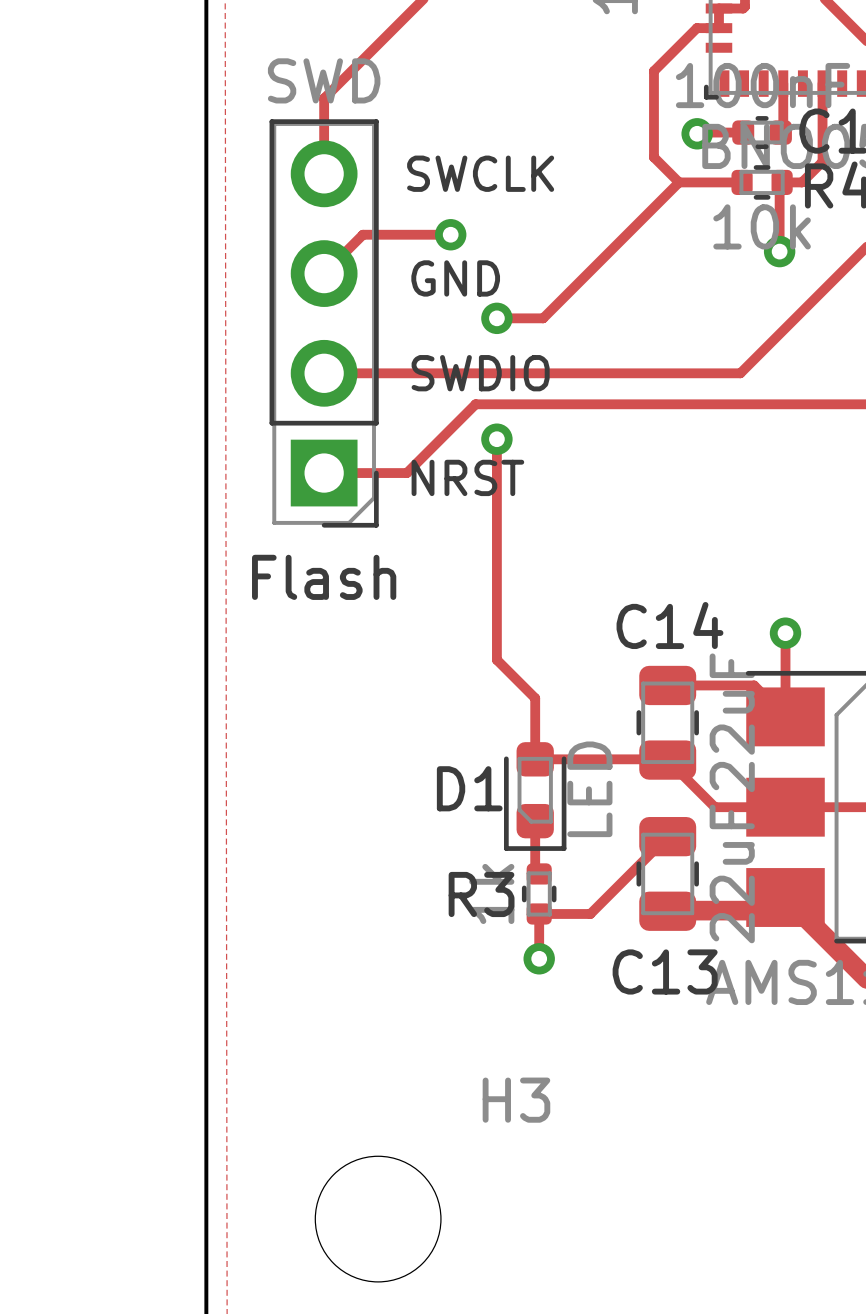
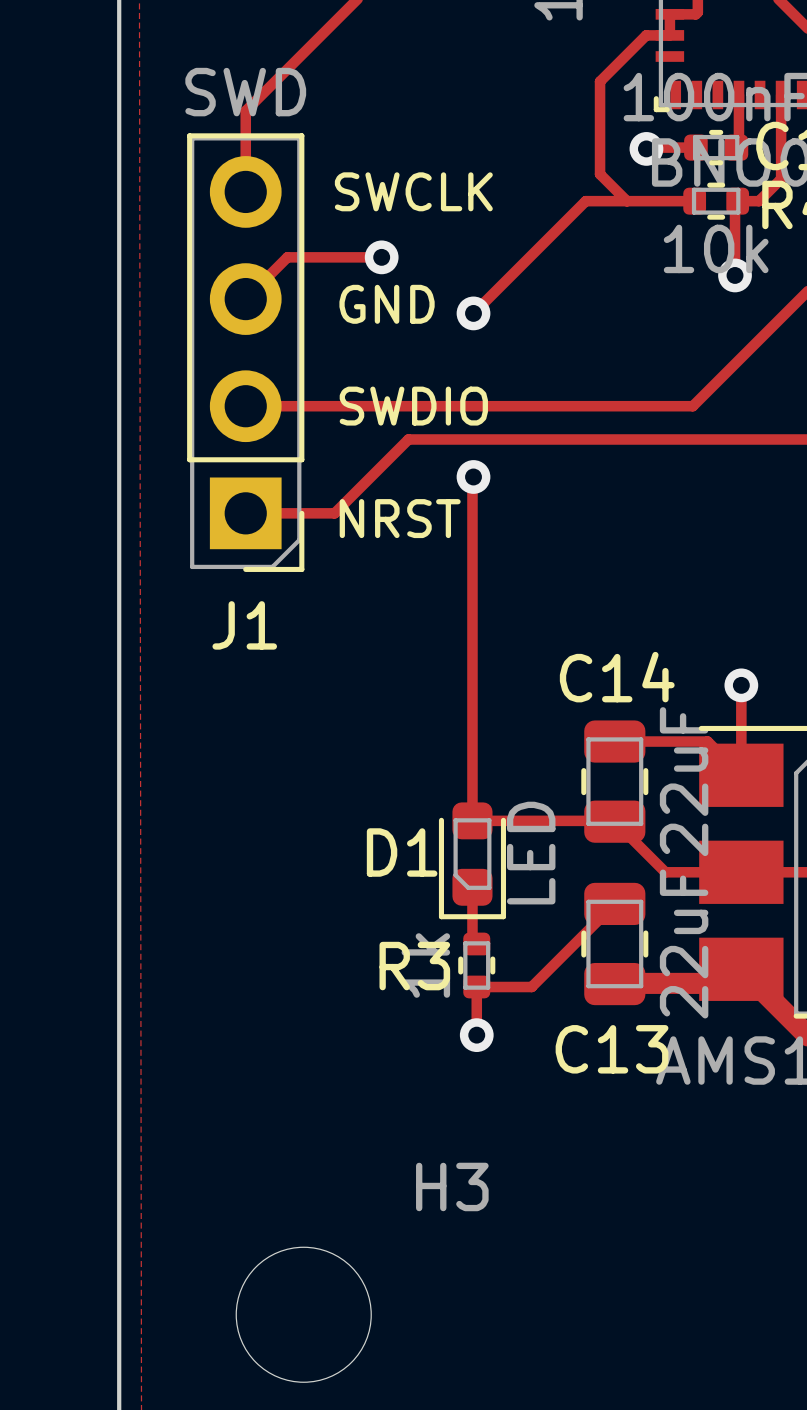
track: (679, 182) (543, 318) (496, 318) -> (626, 201) (585, 201) (473, 313)
via position: (496, 318) -> (473, 313)
track: (496, 439) (496, 659) (535, 698) -> (473, 476) (472, 755)
via position: (496, 439) -> (473, 476)
Flash name: Flash (324, 577) -> J1 (244, 625)

